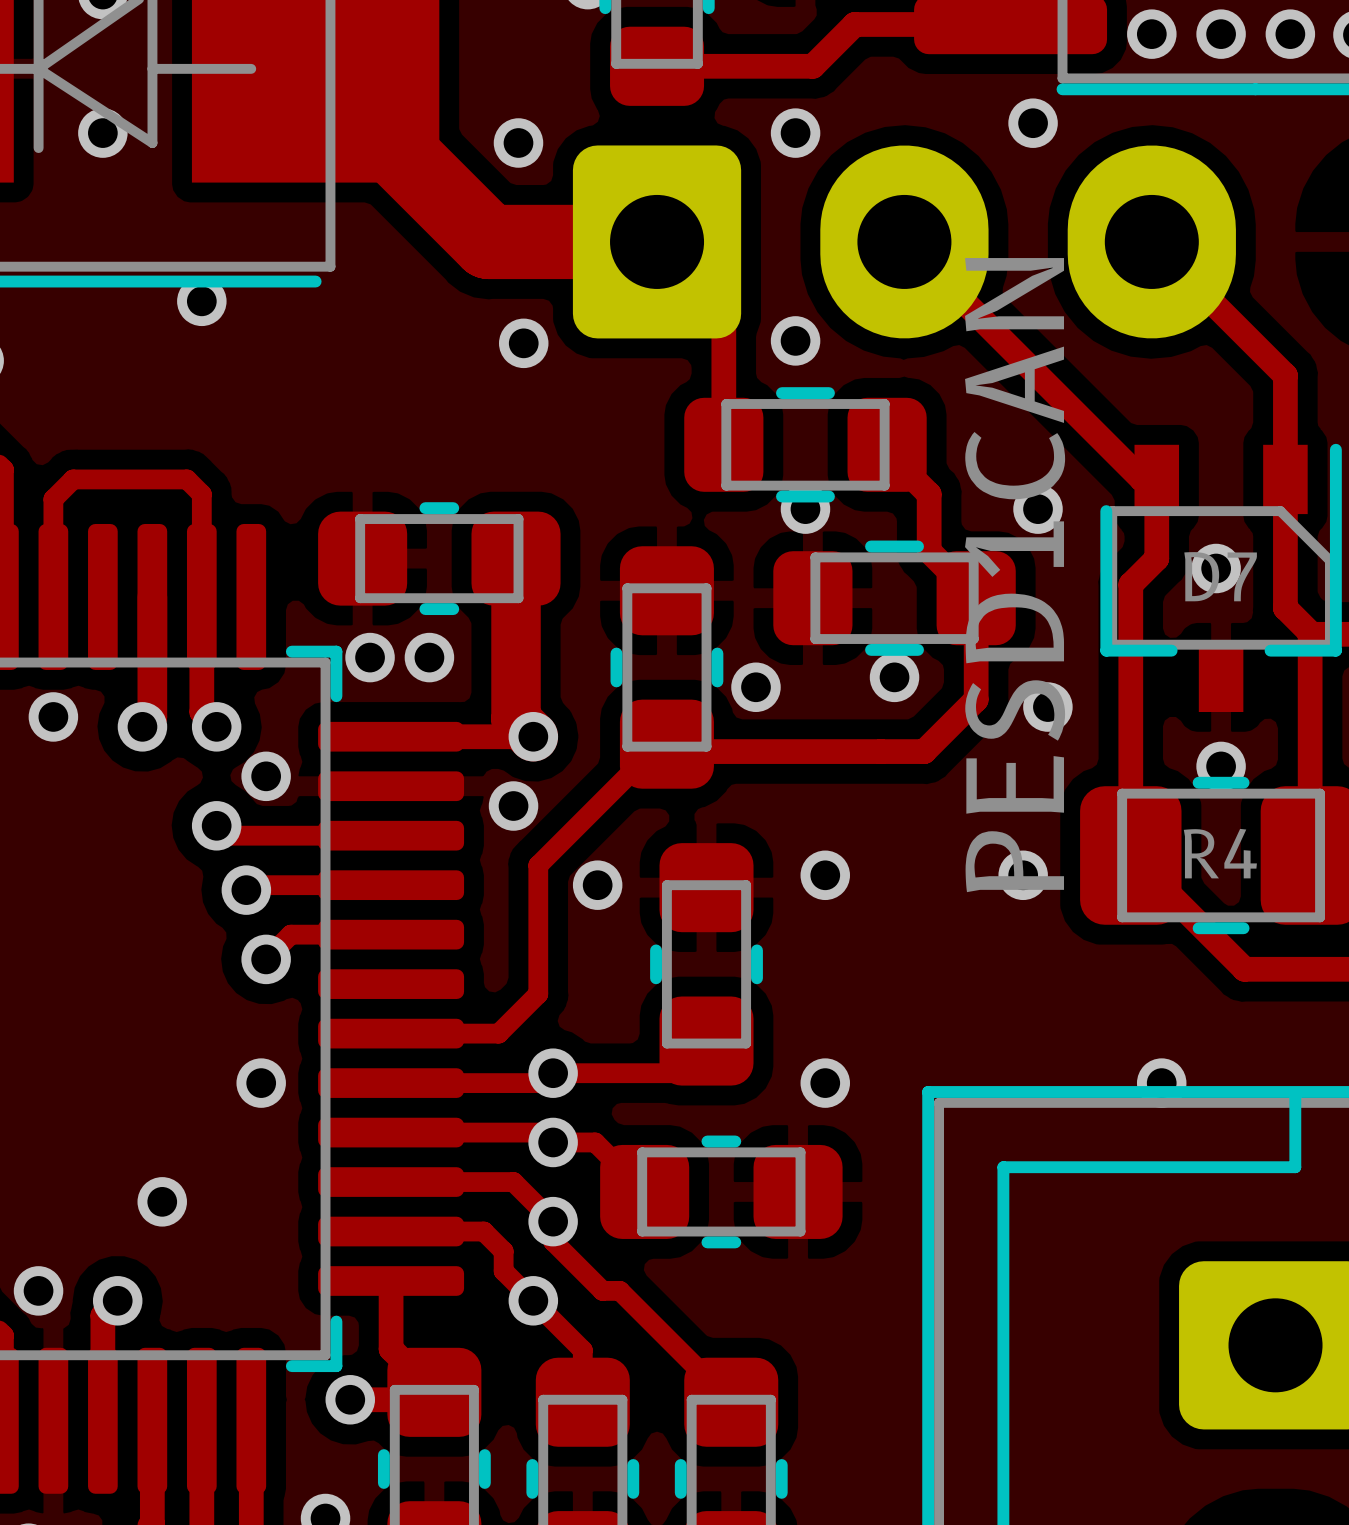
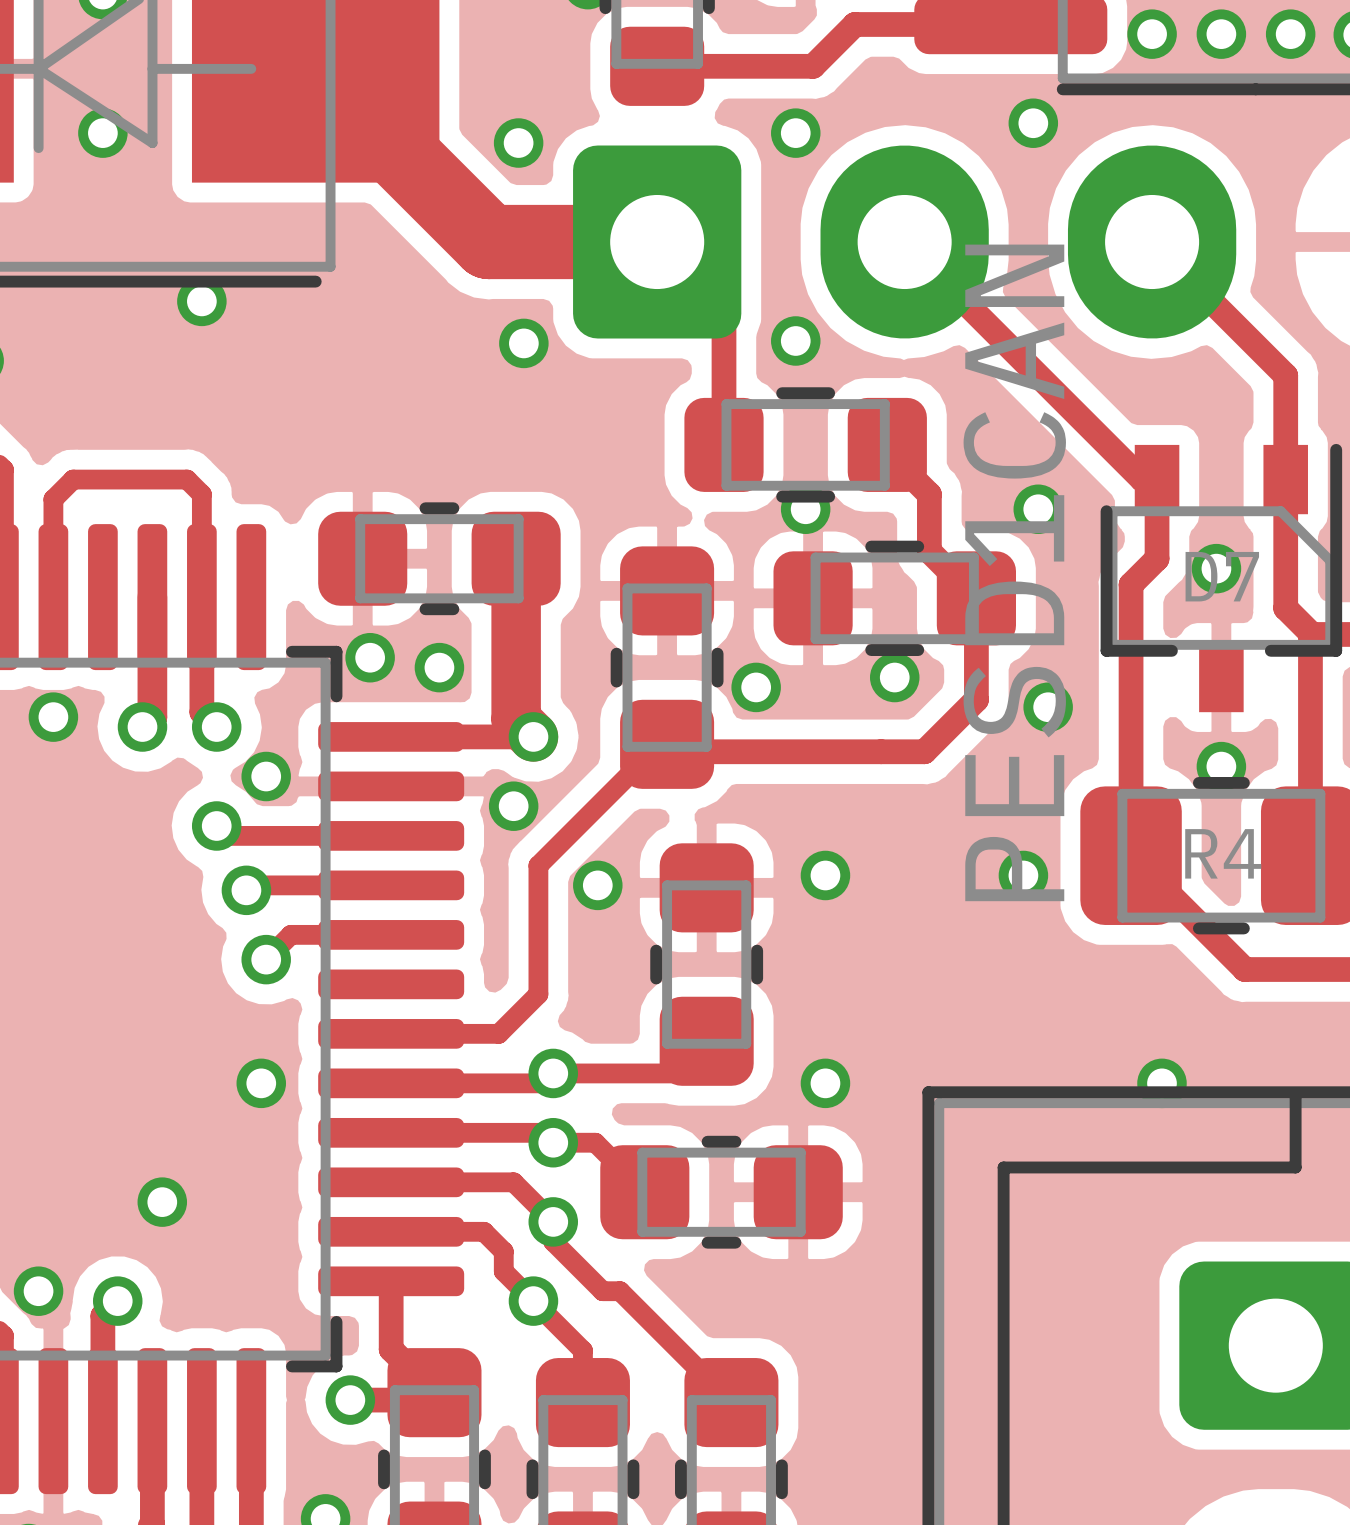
via position: (429, 657) -> (439, 667)

